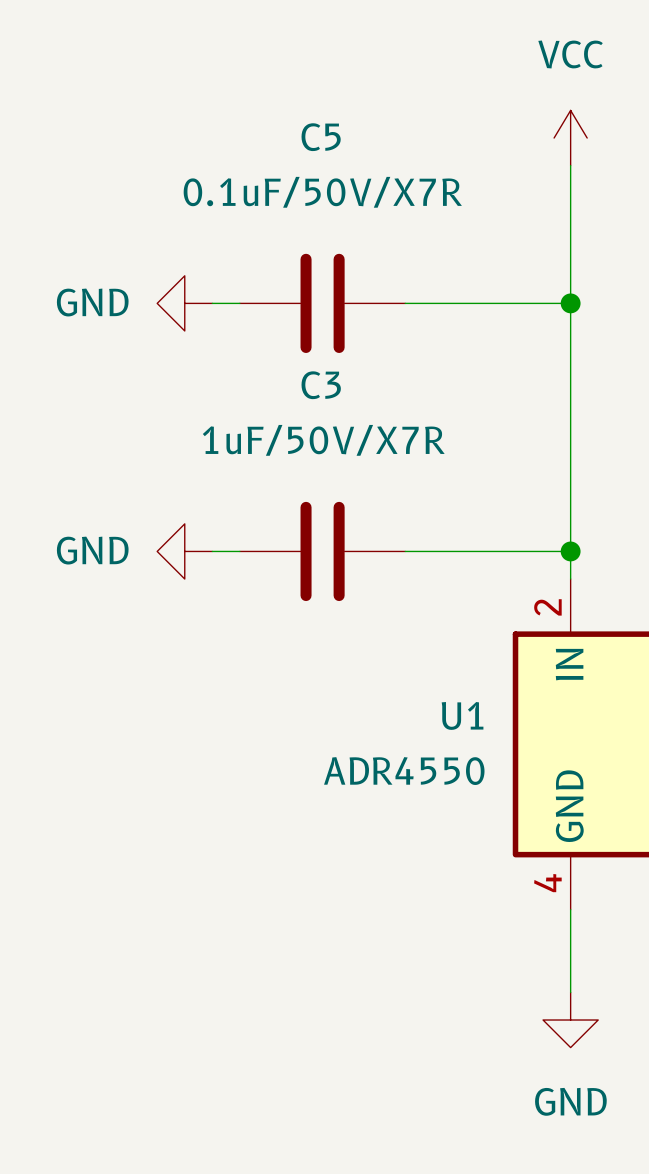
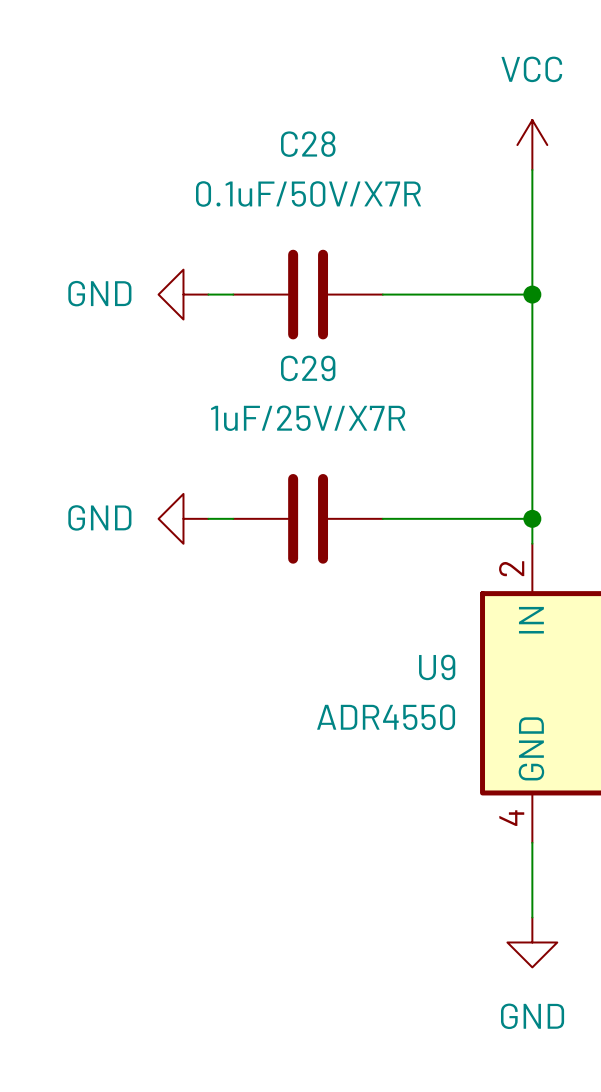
C5 name: C5 (321, 137) -> C28 (308, 144)
C3 name: C3 (321, 385) -> C29 (308, 368)
C3 value: 1uF/50V/X7R (323, 440) -> 1uF/25V/X7R (308, 418)
U1 name: U1 (462, 715) -> U9 (437, 667)

